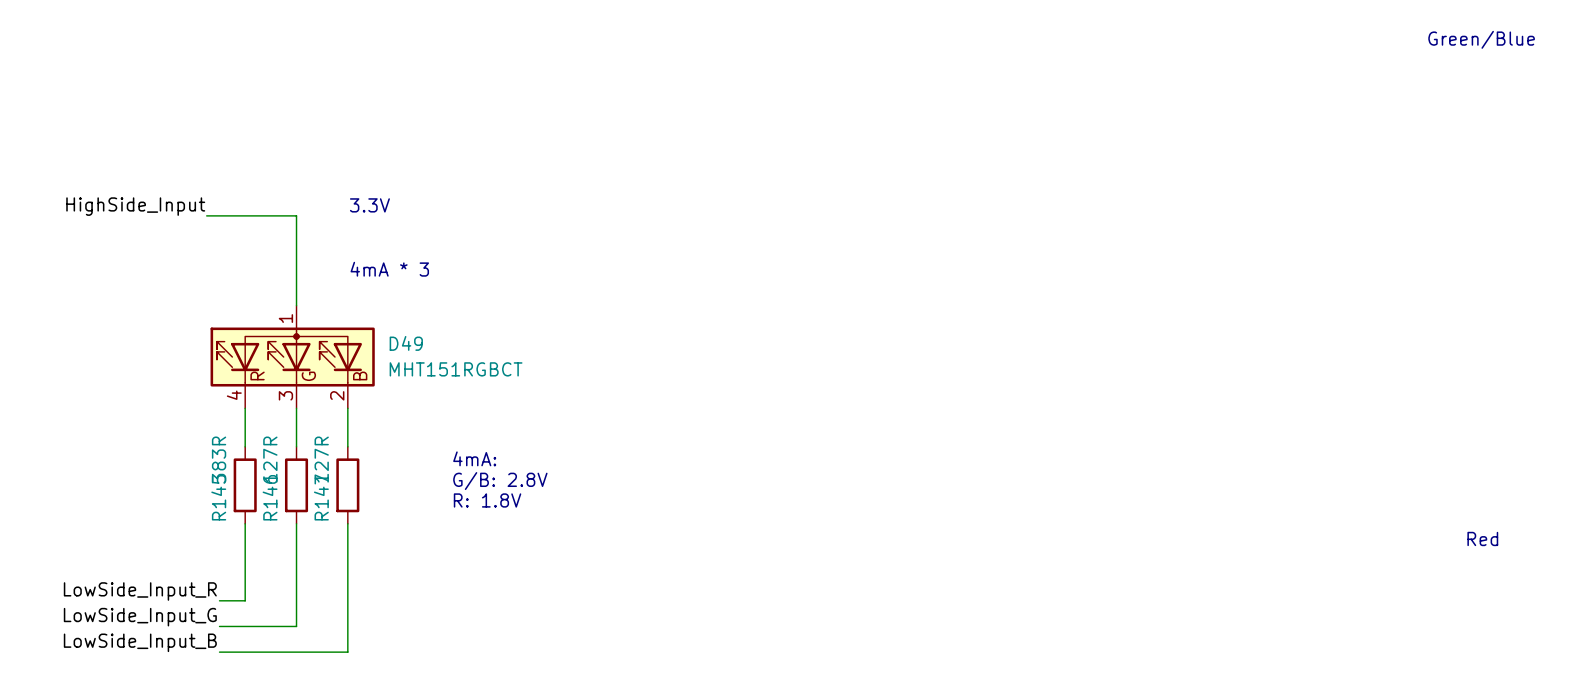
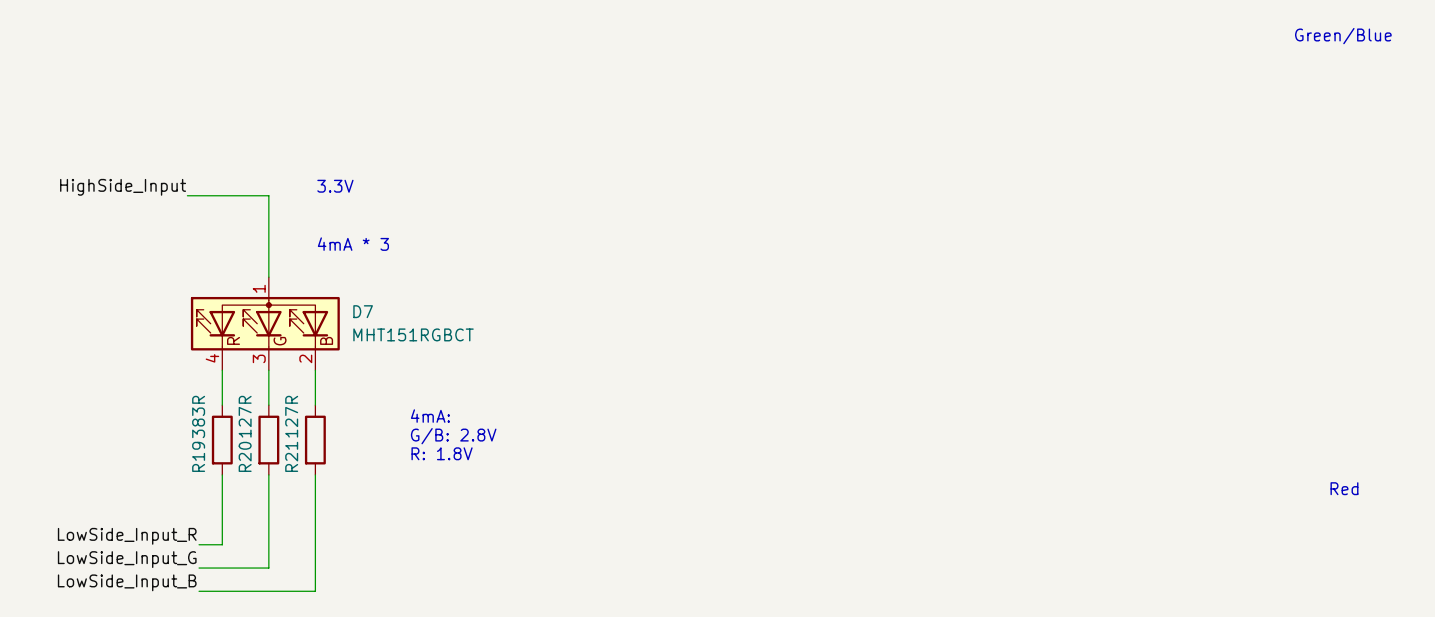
D49 name: D49 (406, 343) -> D7 (363, 311)
R145 name: R145 (218, 497) -> R19 (198, 456)
R146 name: R146 (270, 497) -> R20 (245, 456)
R147 name: R147 (321, 497) -> R21 (291, 456)

